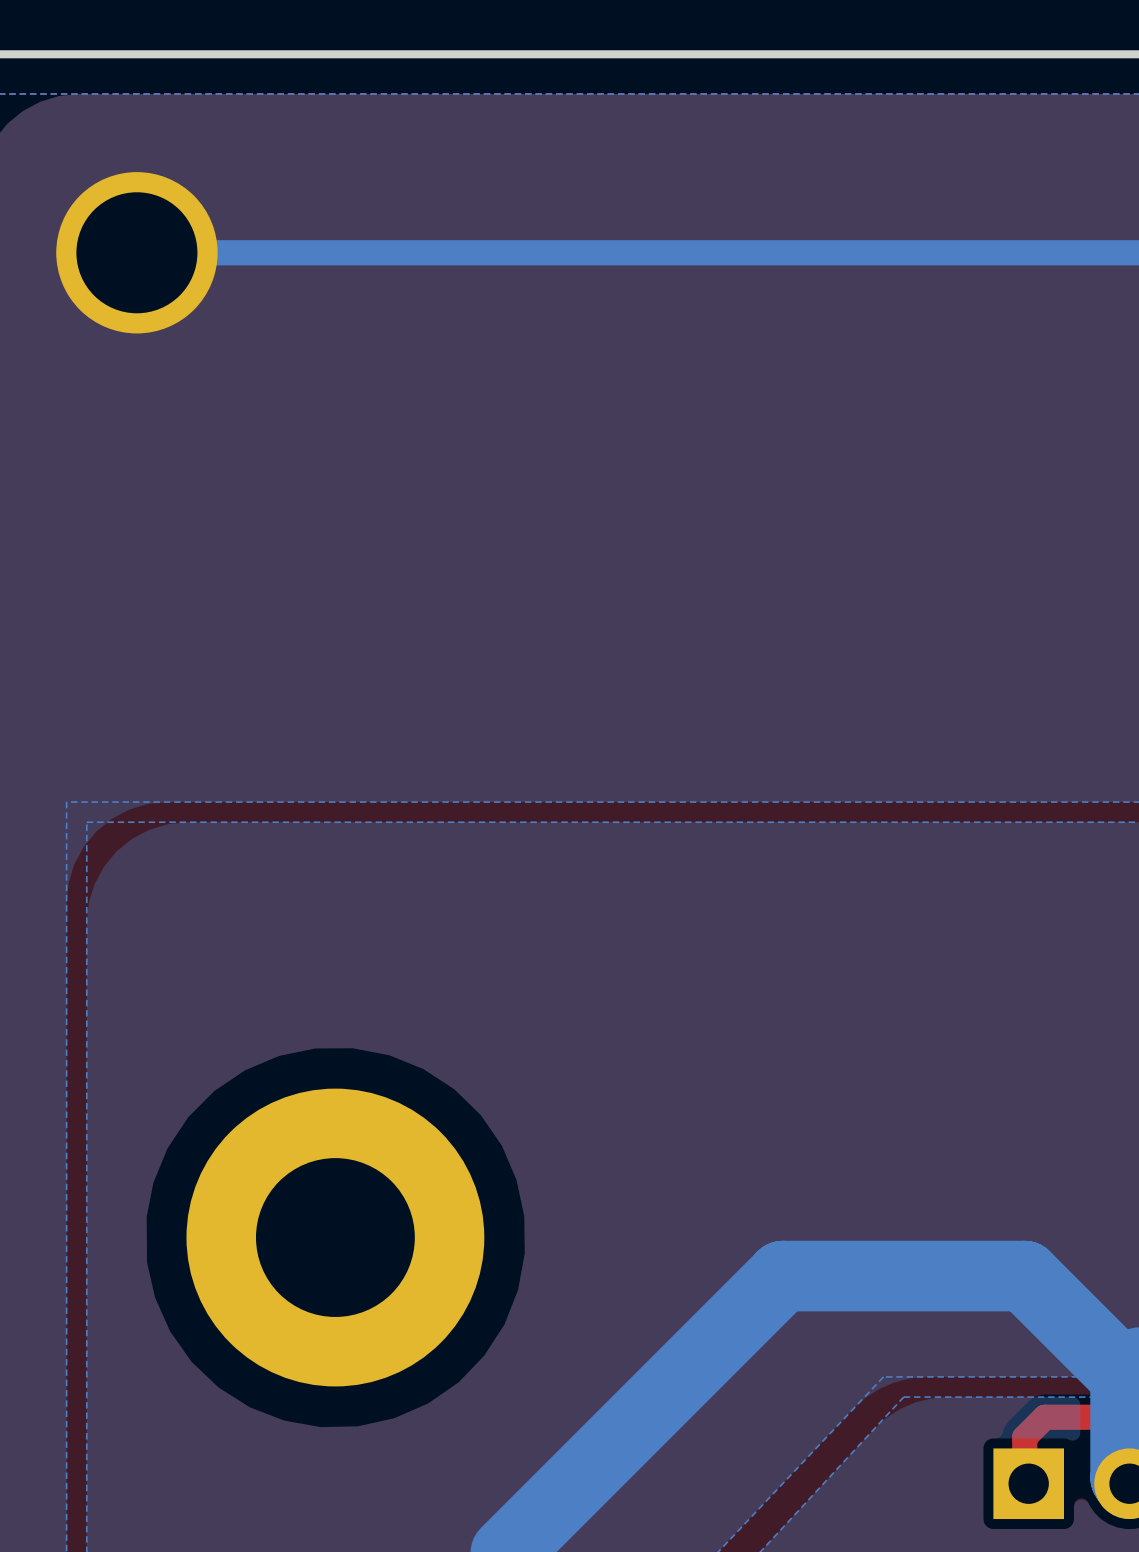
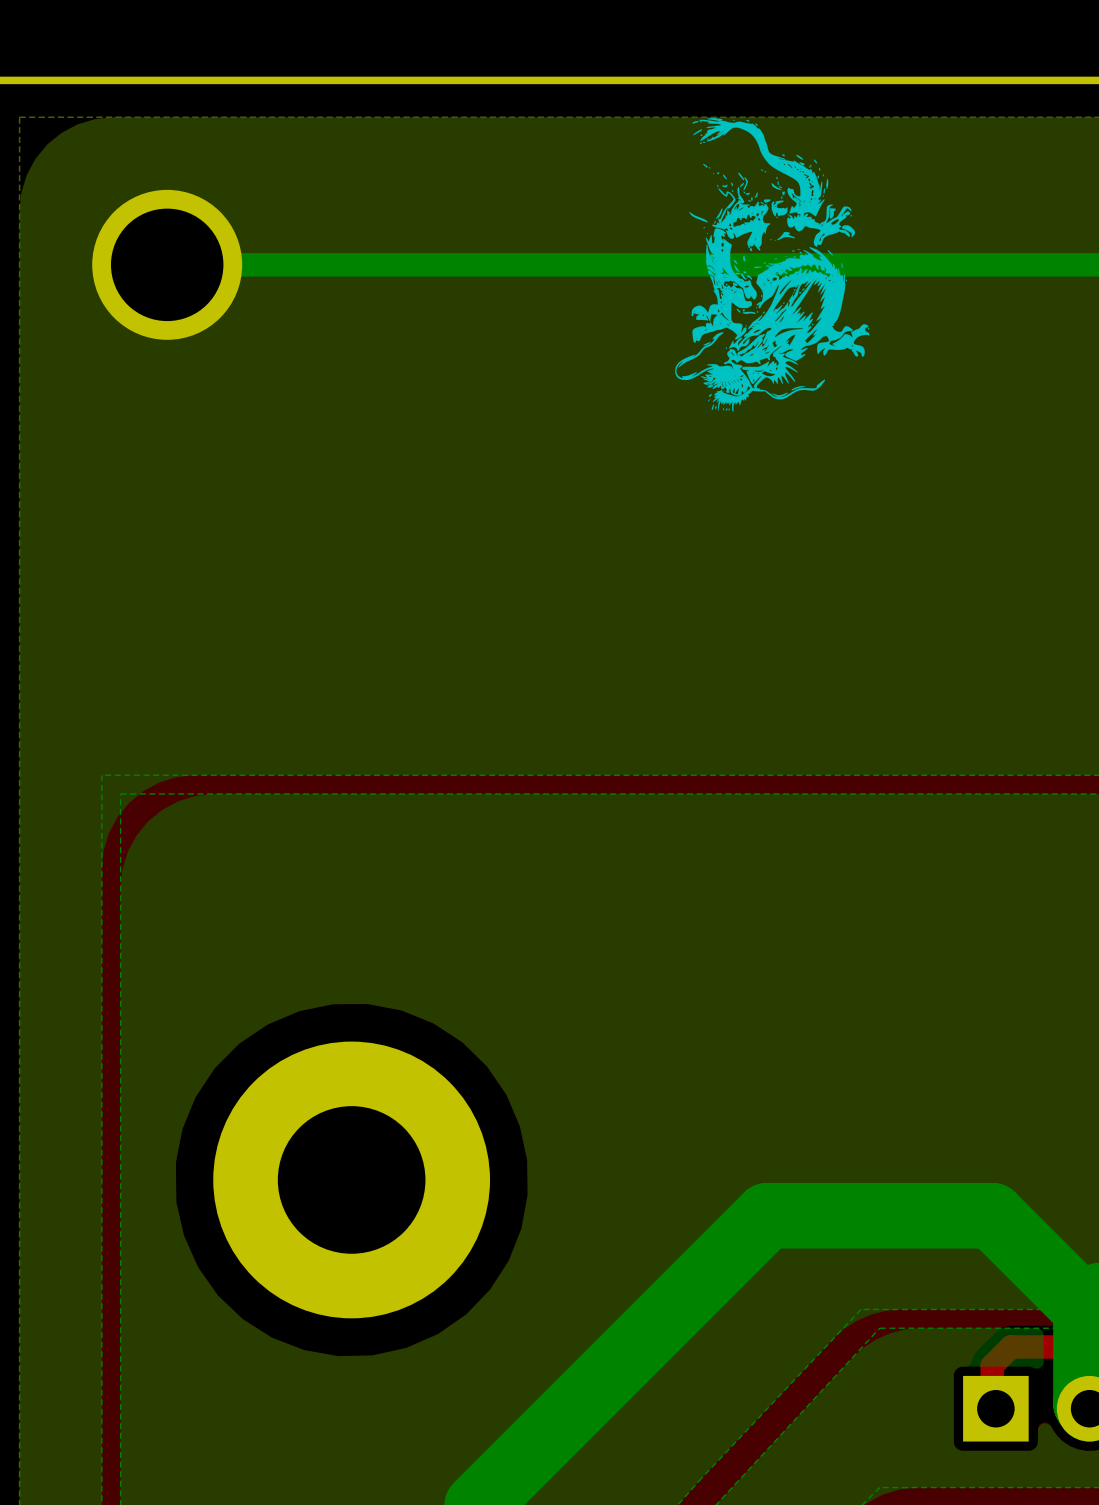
drawing: none -> [675, 118, 870, 412]

